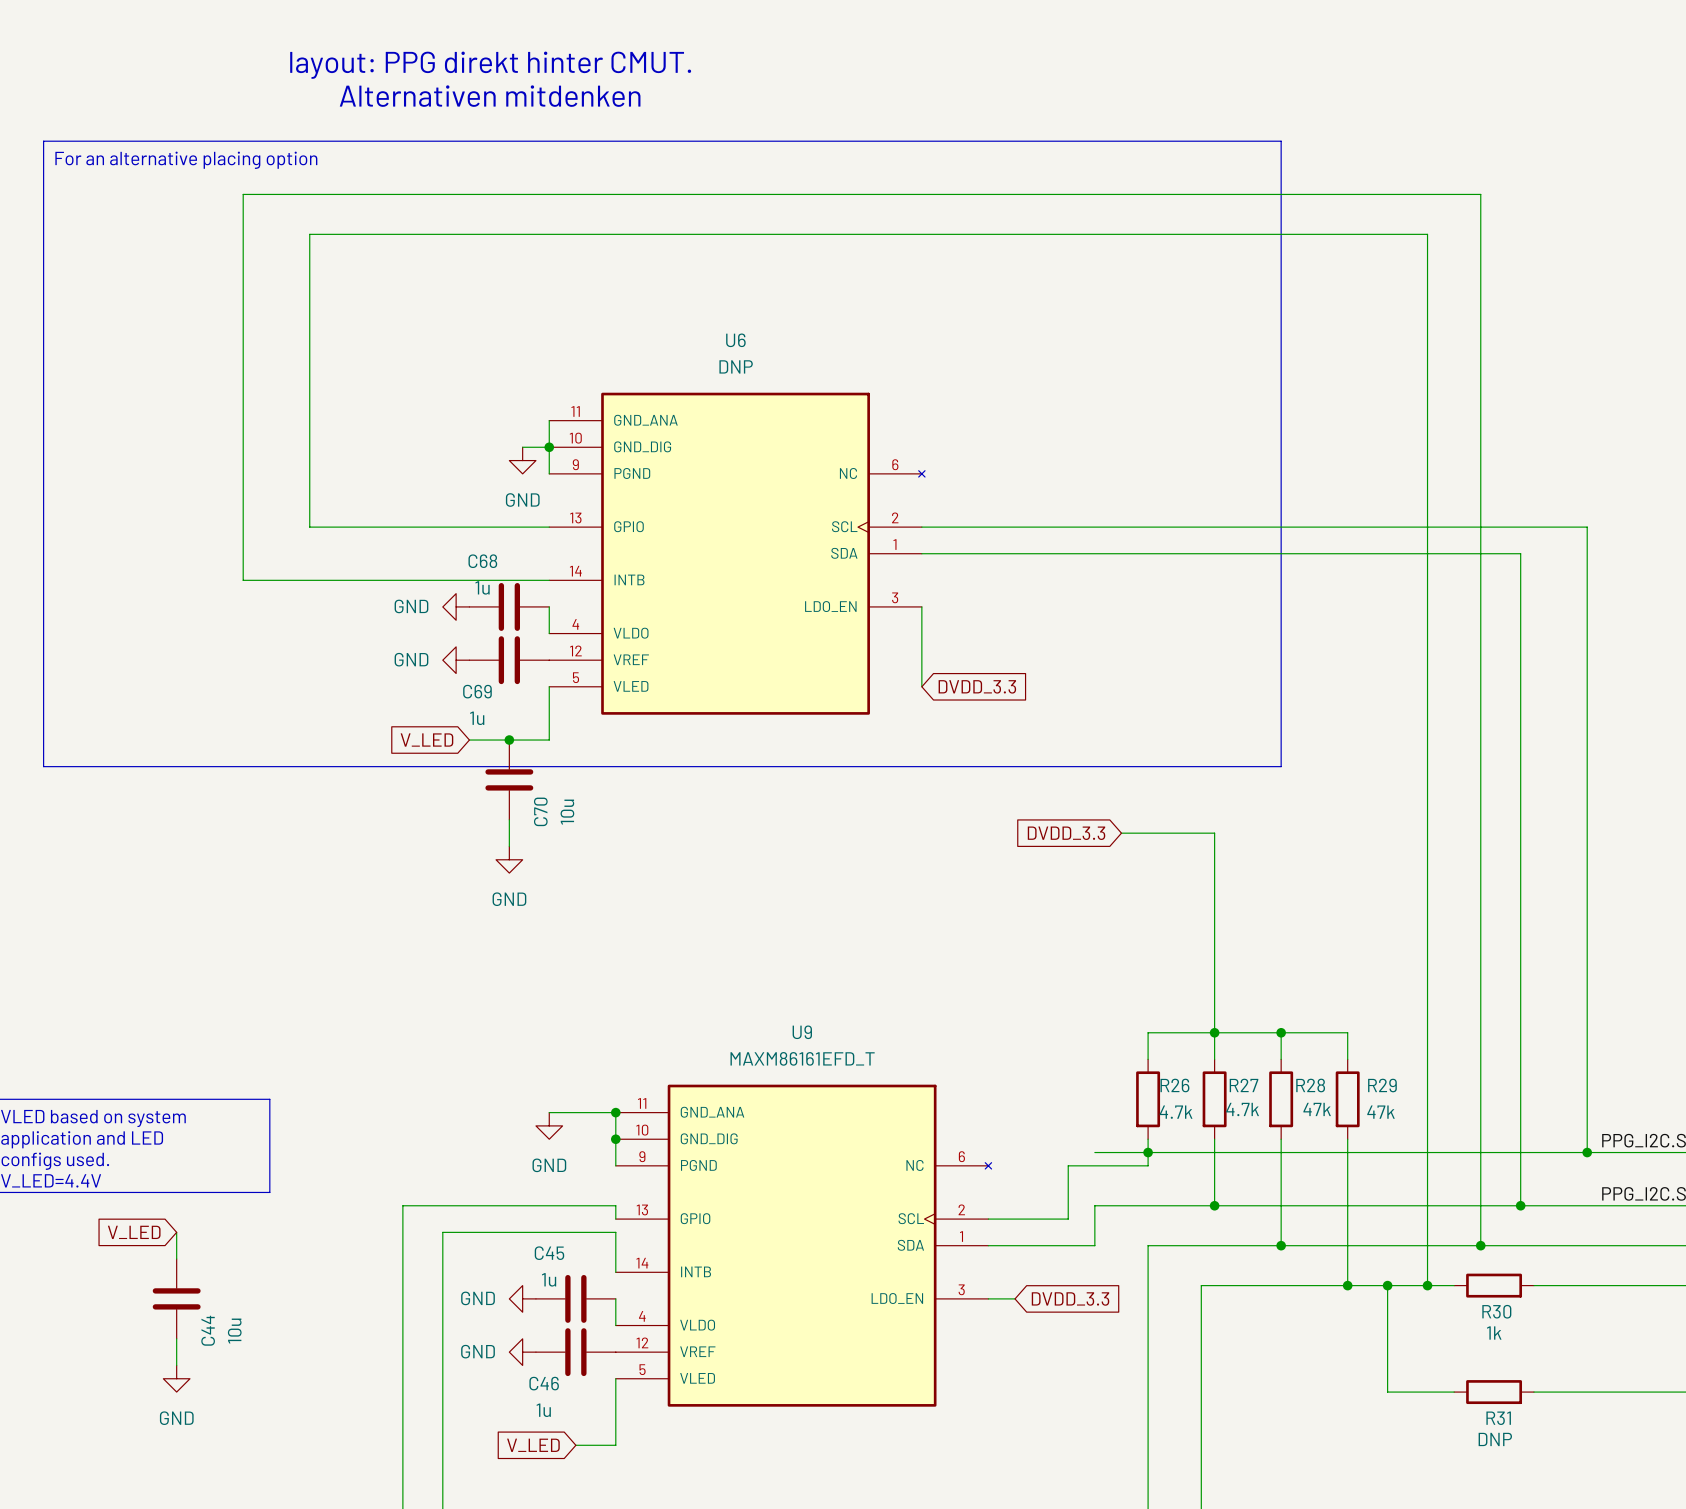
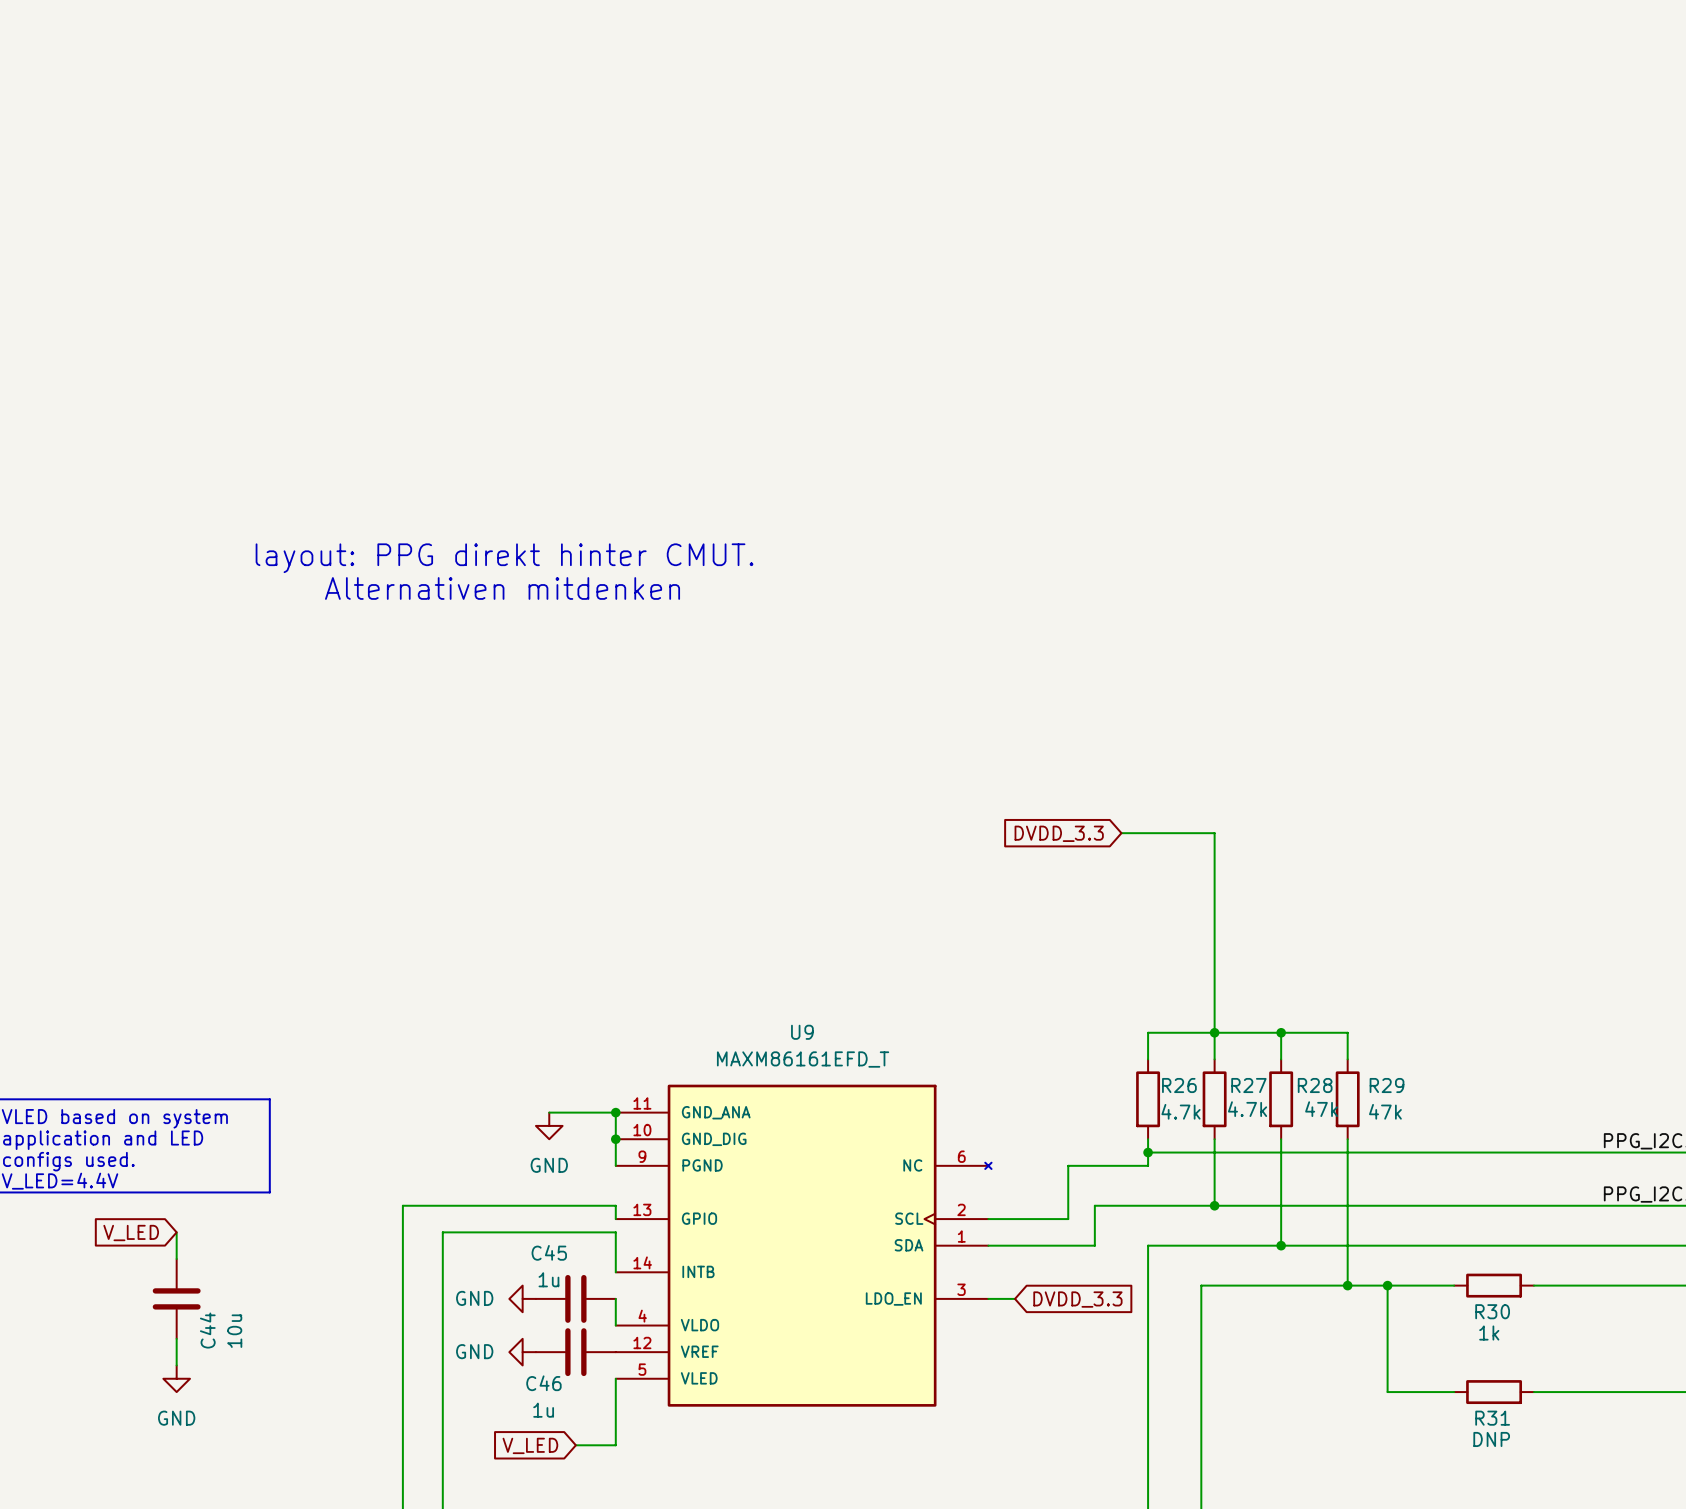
text: layout: PPG direkt hinter CMUT. (490, 65) -> none
text: Alternativen mitdenken (490, 96) -> none
line: (43, 141) (1281, 141) (1281, 766) (43, 766) (43, 141) -> none
text: For an alternative placing option (186, 160) -> none
wire: (549, 420) (549, 473) -> none
wire: (522, 447) (549, 447) -> none
junction: (549, 447) -> none
power symbol: GND (522, 460) -> none
wire: (549, 527) (309, 527) (309, 234) (1427, 234) (1427, 1285) -> none
wire: (921, 527) (1587, 527) (1587, 1152) -> none
U6: DNP (737, 553) -> none
wire: (921, 553) (1520, 553) (1520, 1205) -> none
text: none -> layout: PPG direkt hinter CMUT. (504, 558)
wire: (549, 580) (243, 580) (243, 194) (1480, 194) (1480, 1245) -> none
text: none -> Alternativen mitdenken (502, 588)
power symbol: GND (456, 606) -> none
C68: 1u (509, 606) -> none
wire: (549, 606) (549, 633) -> none
wire: (921, 606) (921, 686) -> none
power symbol: GND (456, 660) -> none
C69: 1u (509, 660) -> none
wire: (549, 686) (549, 740) (469, 740) -> none
global label: DVDD_3.3 (977, 686) -> none
global label: V_LED (426, 740) -> none
junction: (509, 740) -> none
C70: 10u (509, 779) -> none
wire: (509, 819) (509, 846) -> none
power symbol: GND (509, 859) -> none
wire: (1094, 1152) (1148, 1152) -> none
junction: (1587, 1152) -> none
junction: (1520, 1205) -> none
junction: (1480, 1245) -> none
junction: (1427, 1285) -> none

